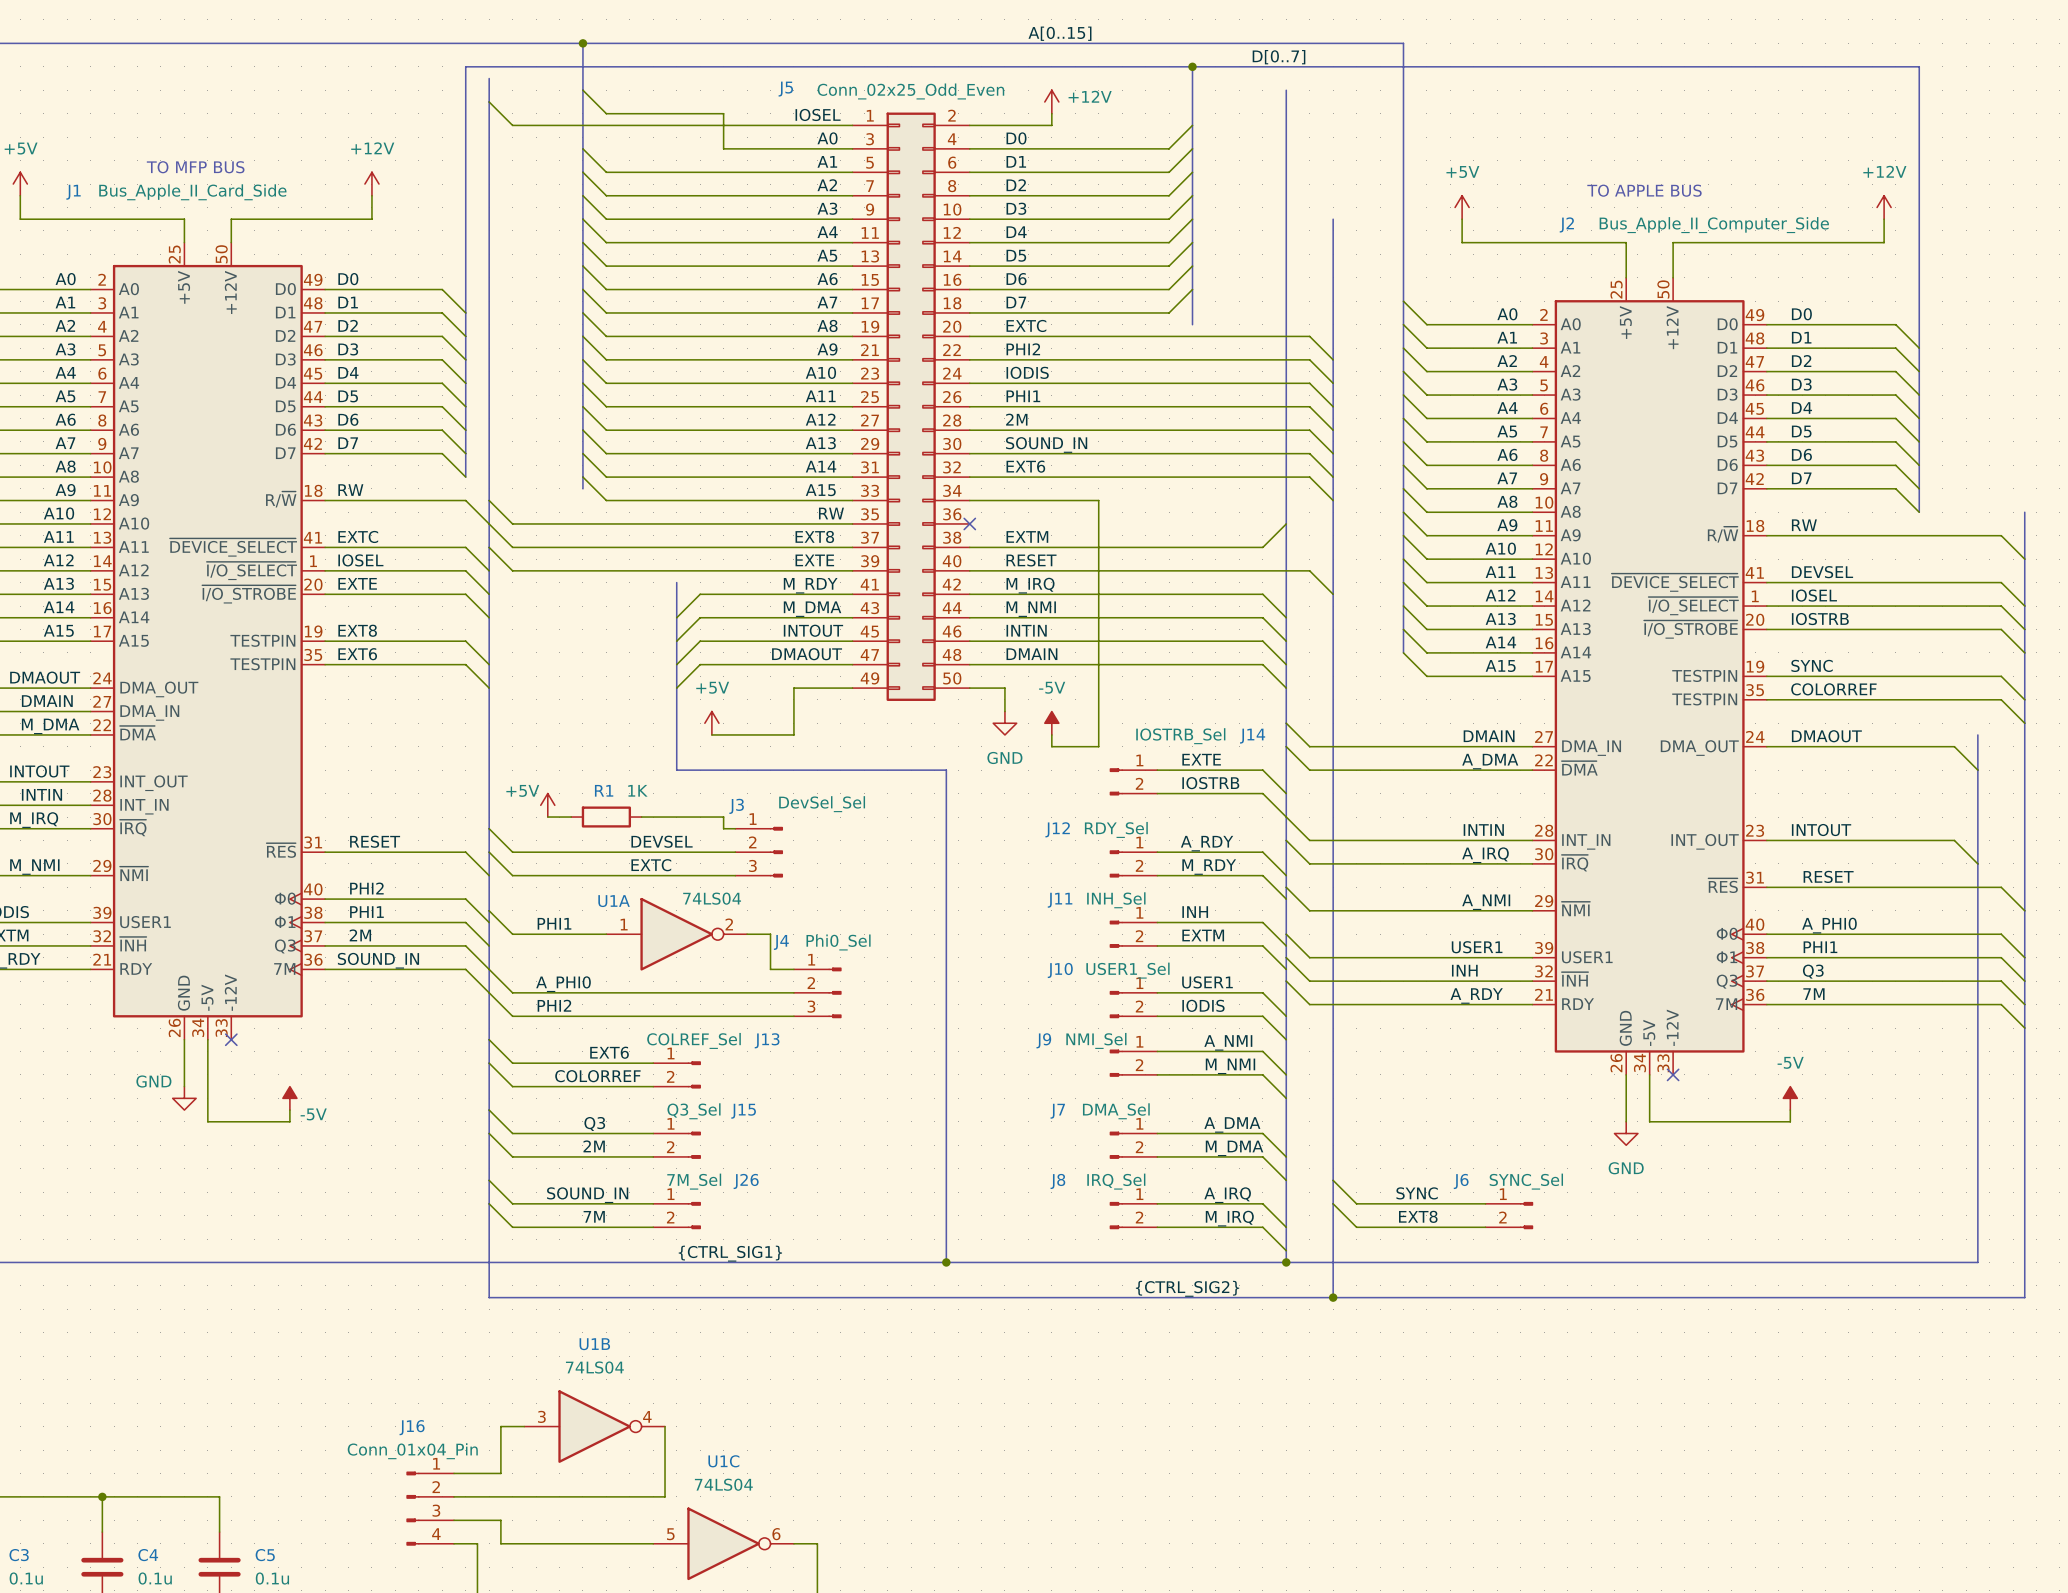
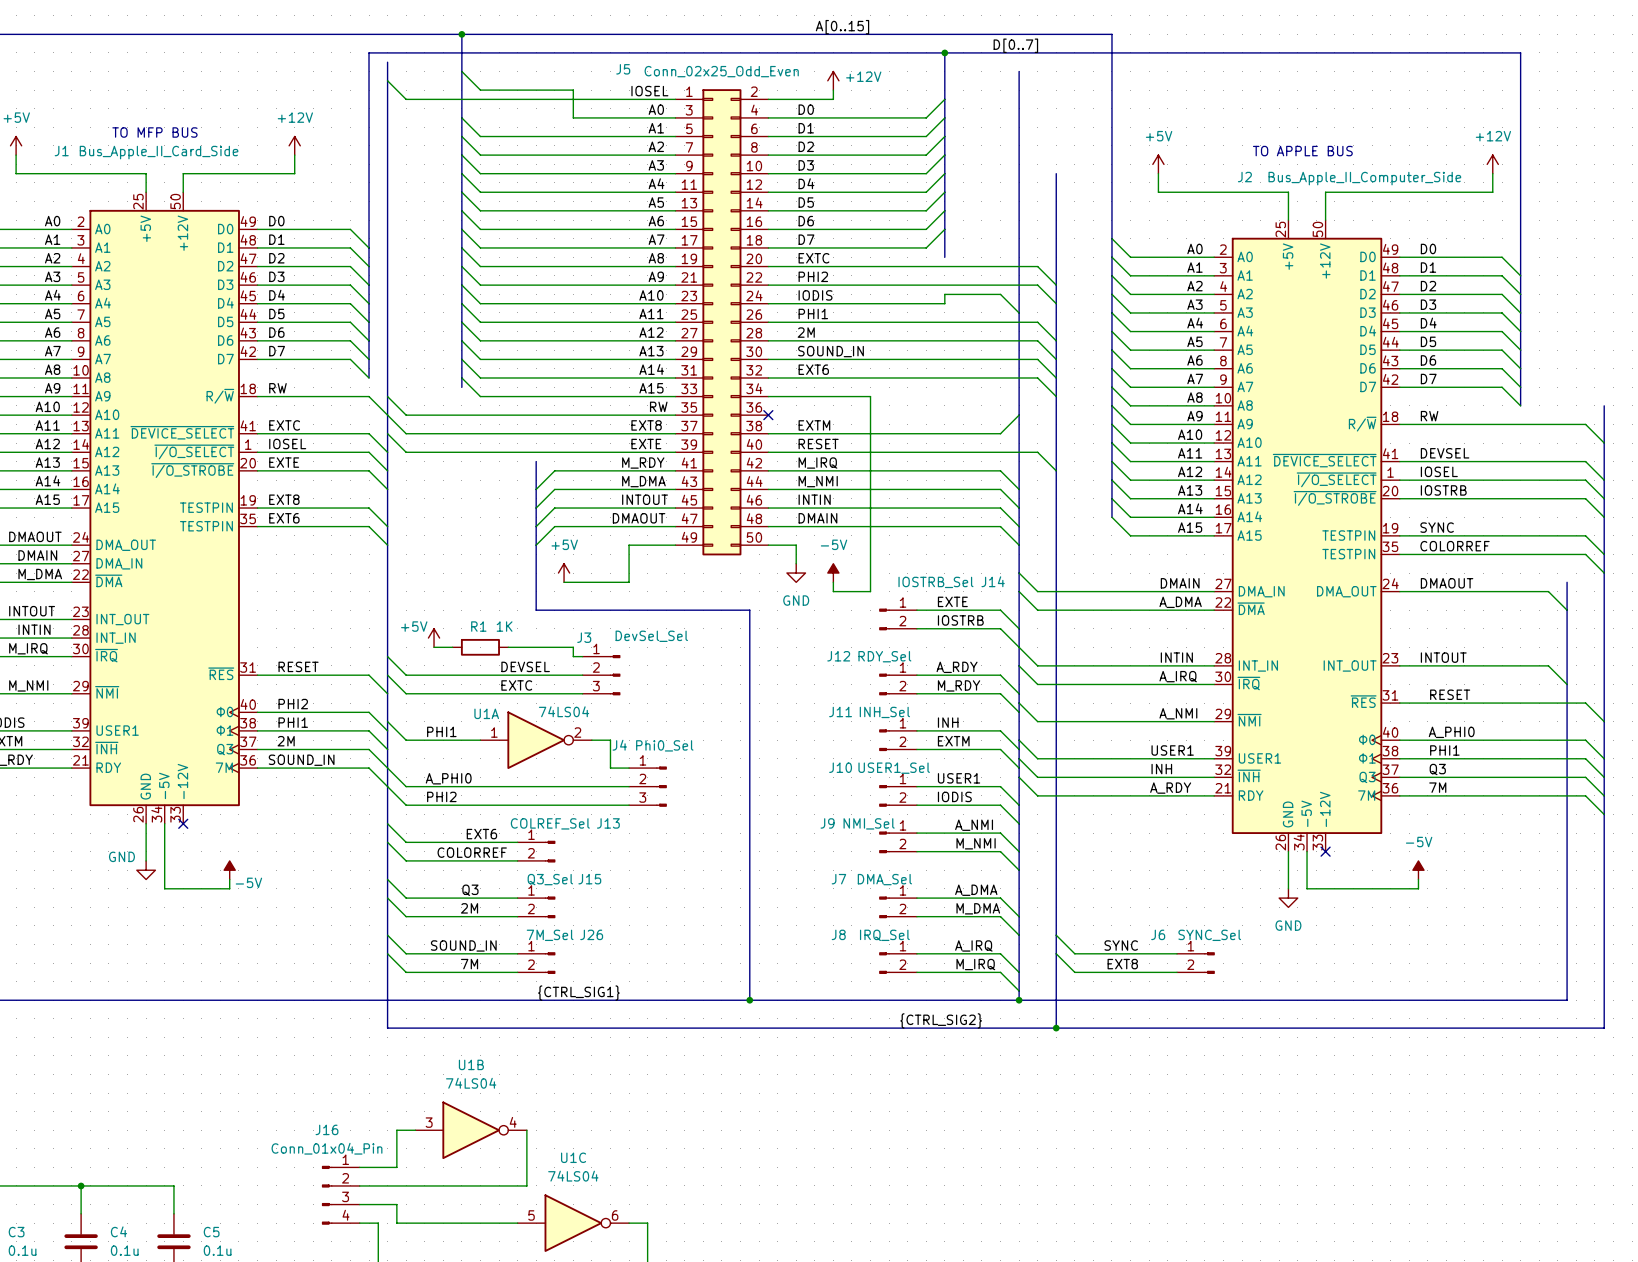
wire: (1192, 383) (1309, 383) (1333, 406) -> (944, 303) (944, 294) (1000, 294) (1019, 312)

